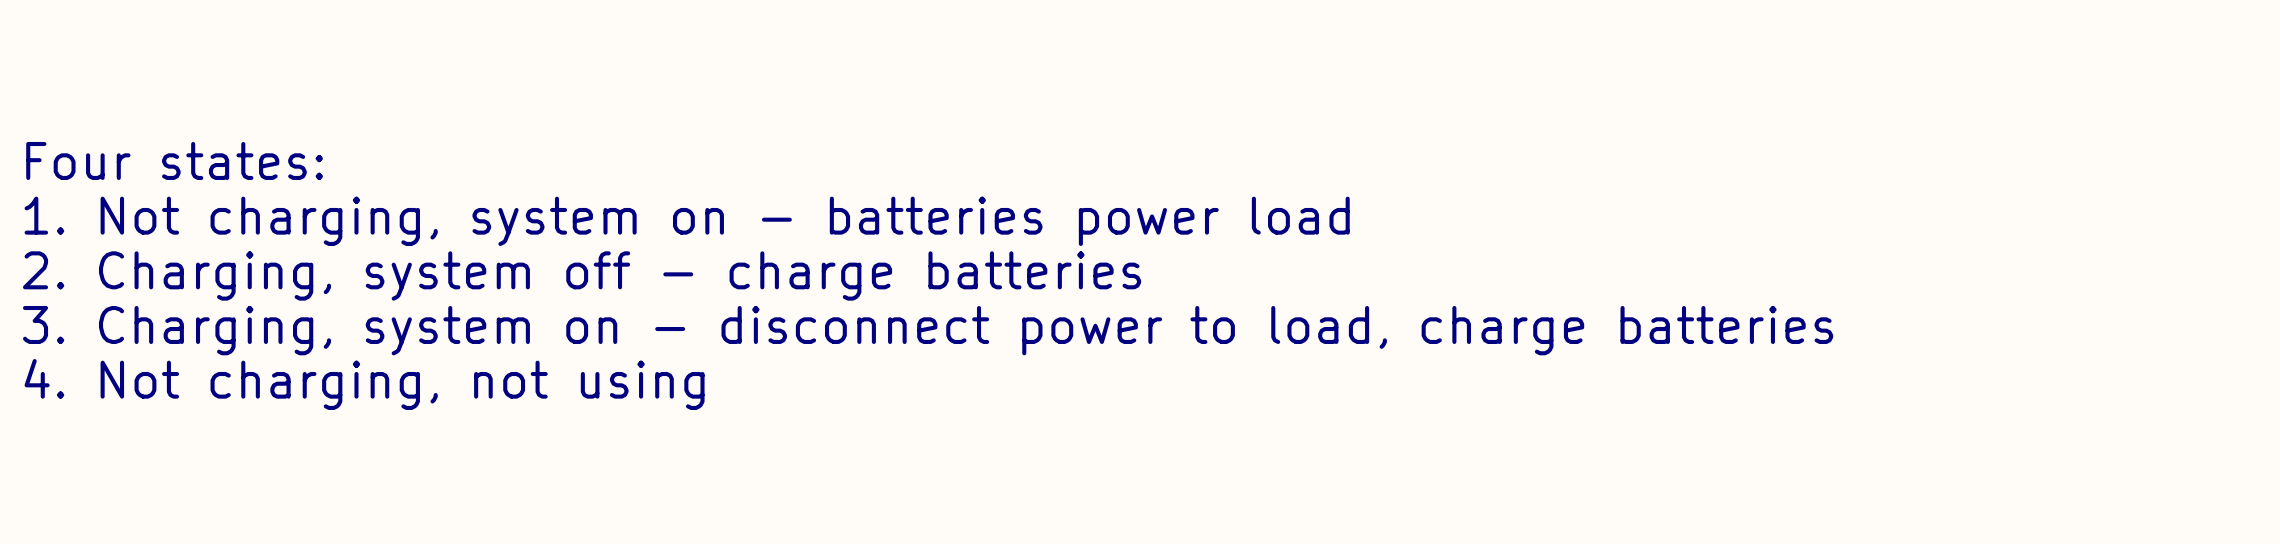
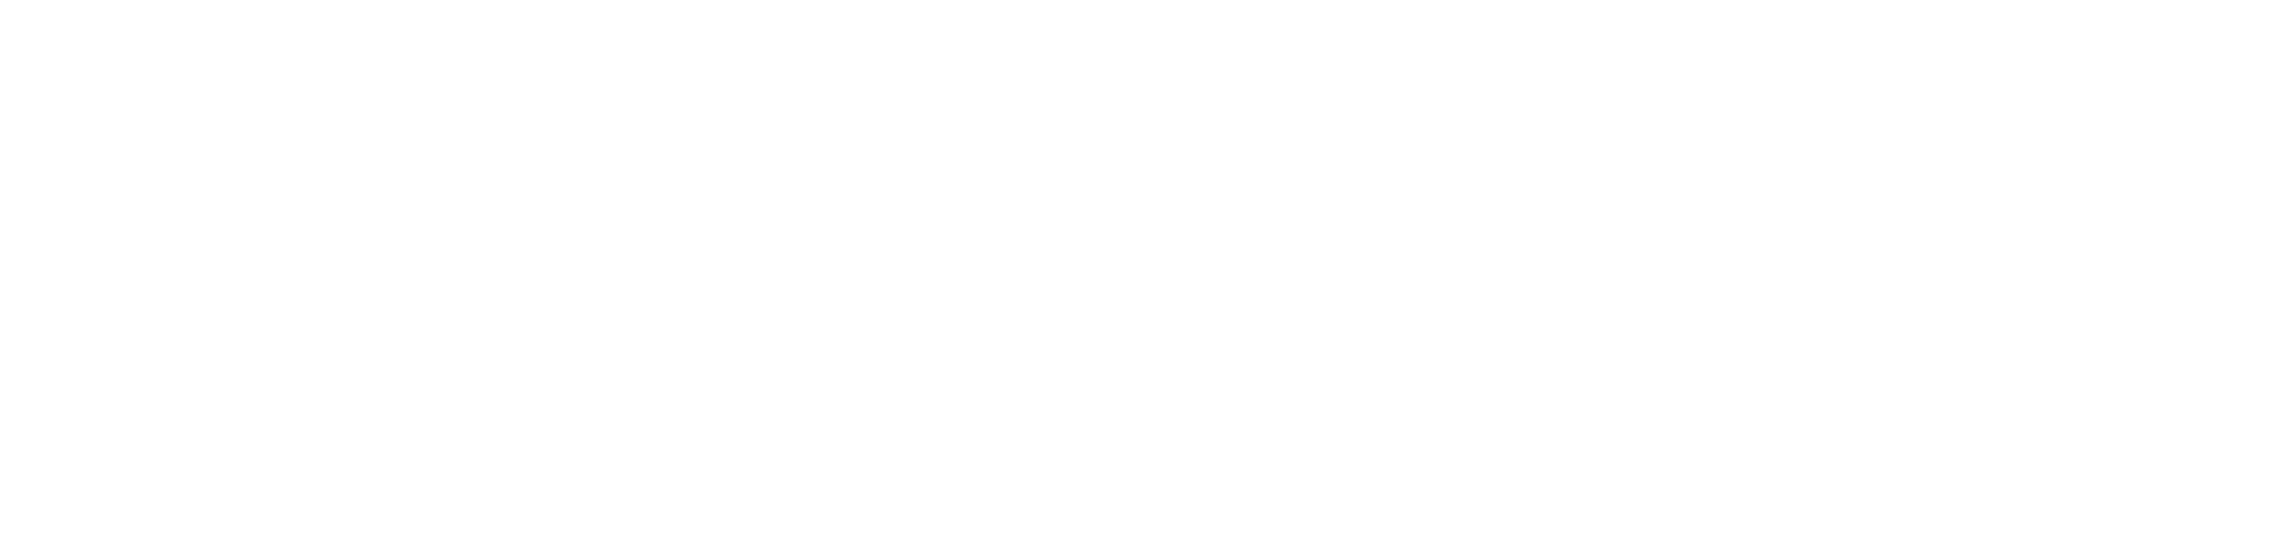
text: Four states: (174, 160) -> none
text: 1. Not charging, system on - batteries power load (687, 221) -> none
text: 2. Charging, system off - charge batteries (582, 275) -> none
text: 3. Charging, system on - disconnect power to load, charge batteries (928, 330) -> none
text: 4. Not charging, not using (364, 384) -> none

